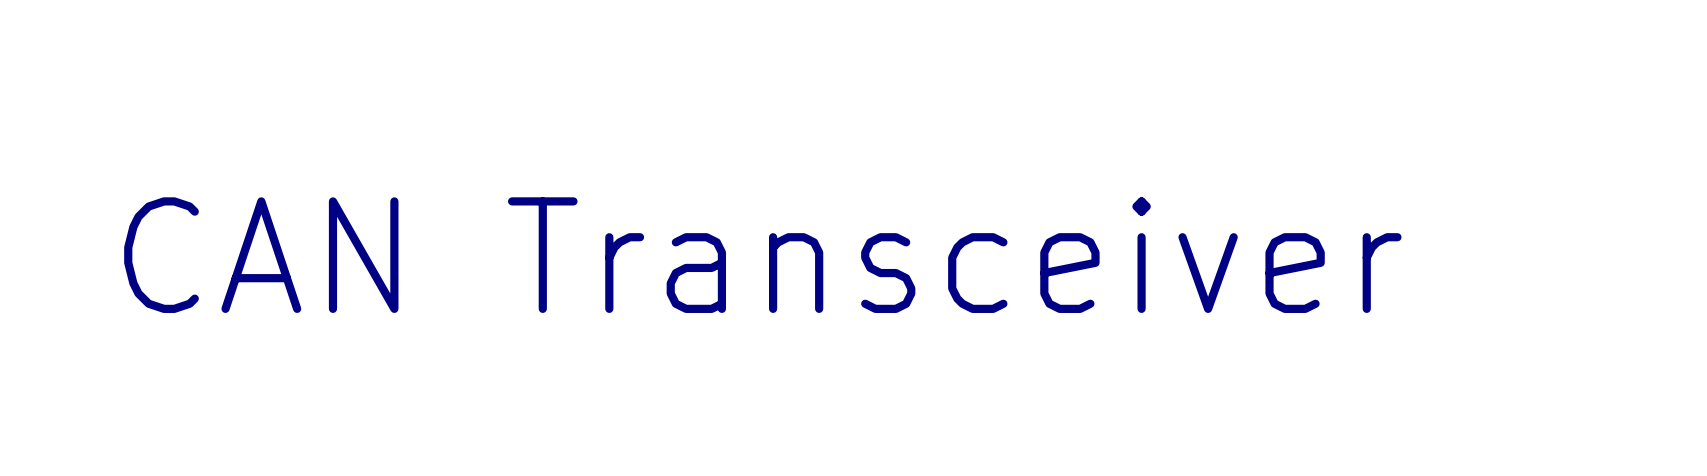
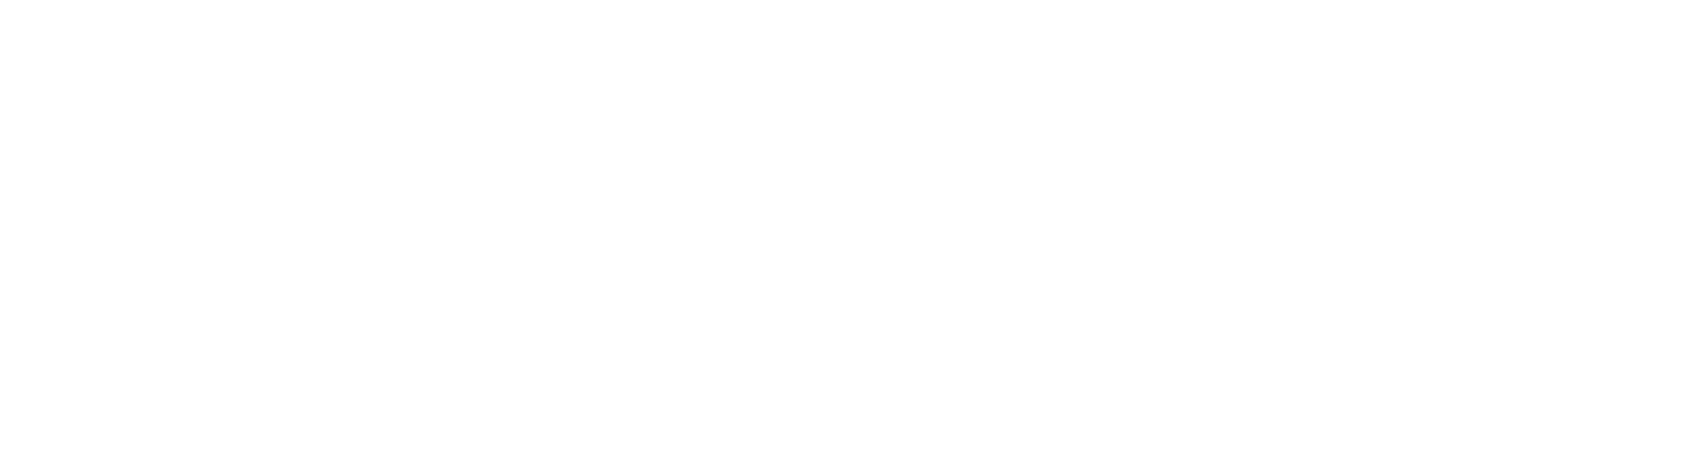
text: CAN Transceiver (762, 255) -> none

